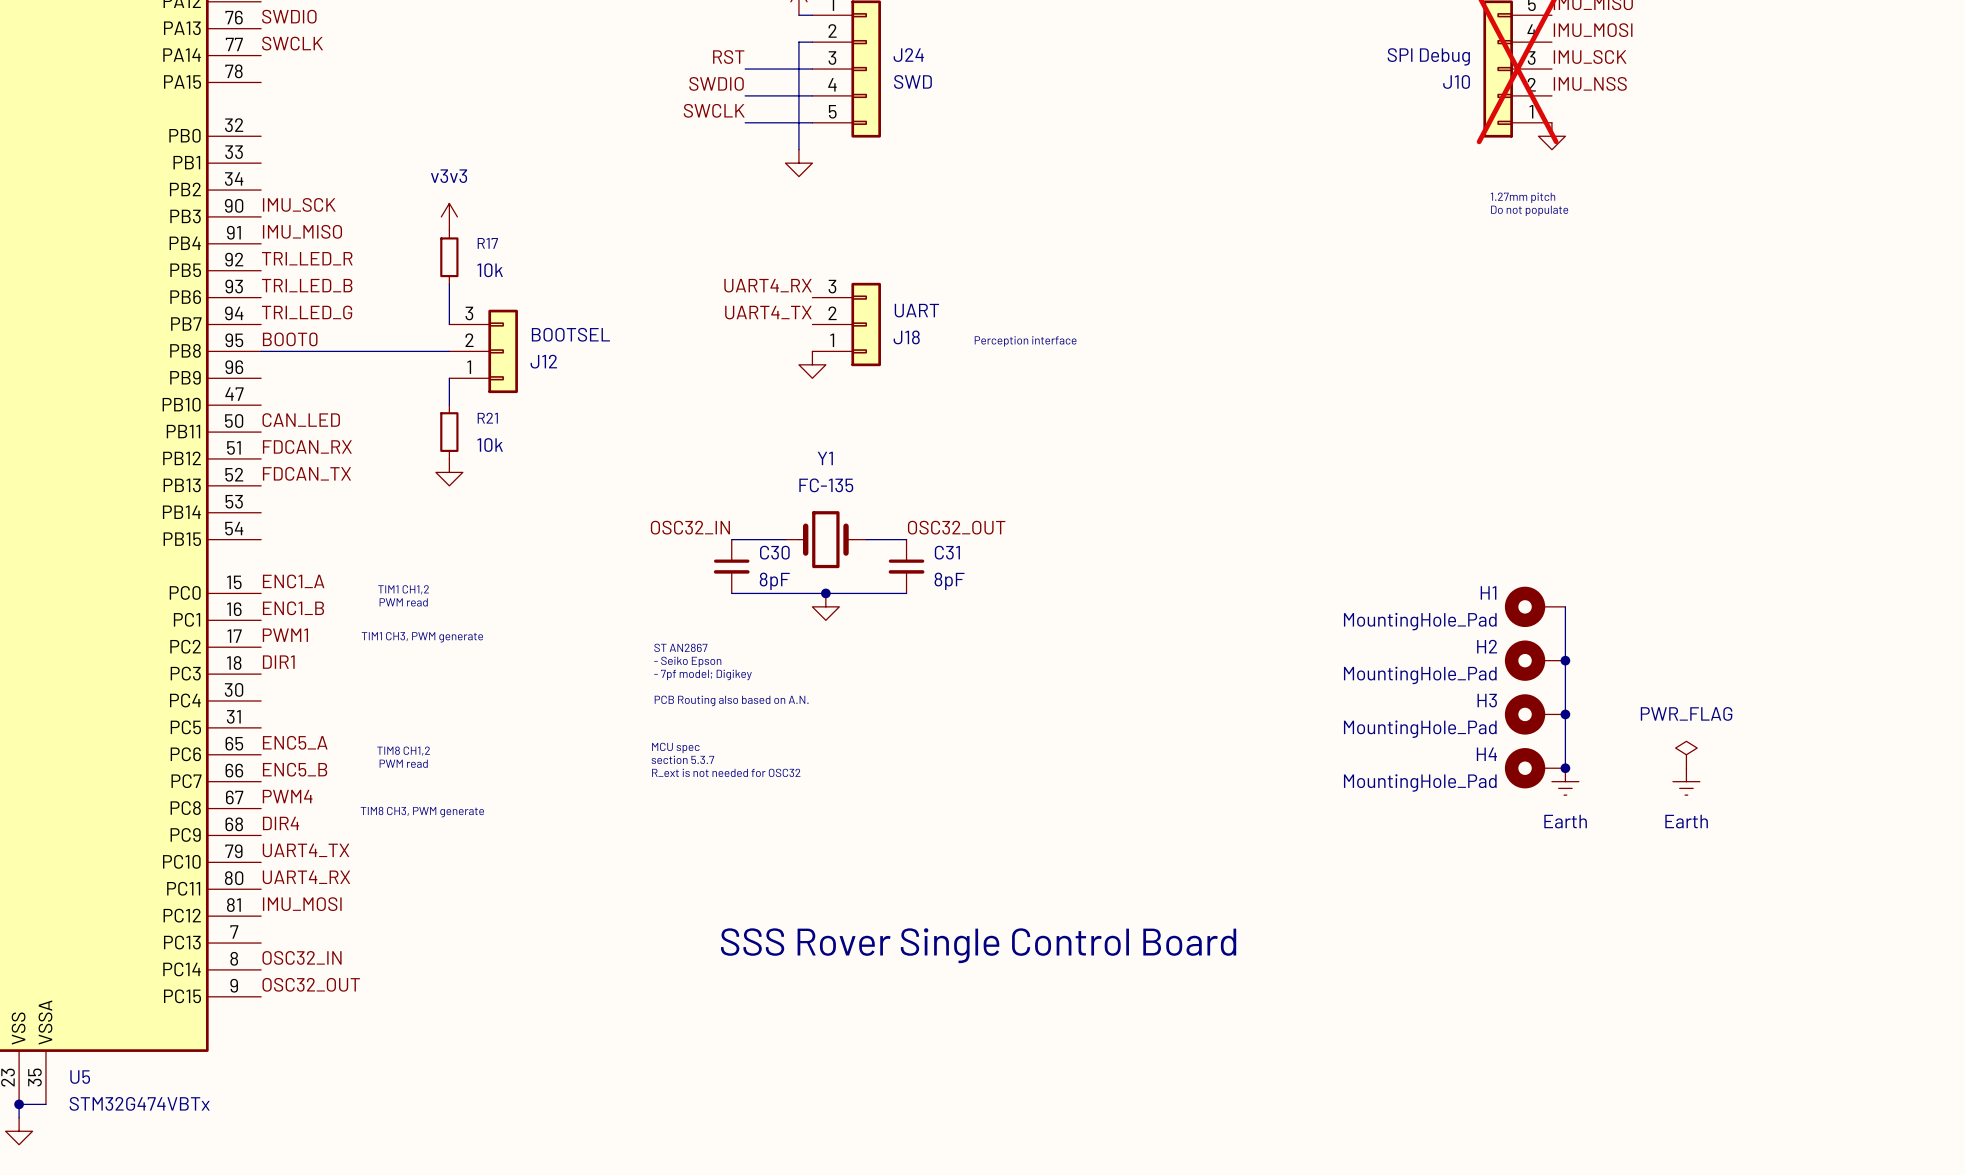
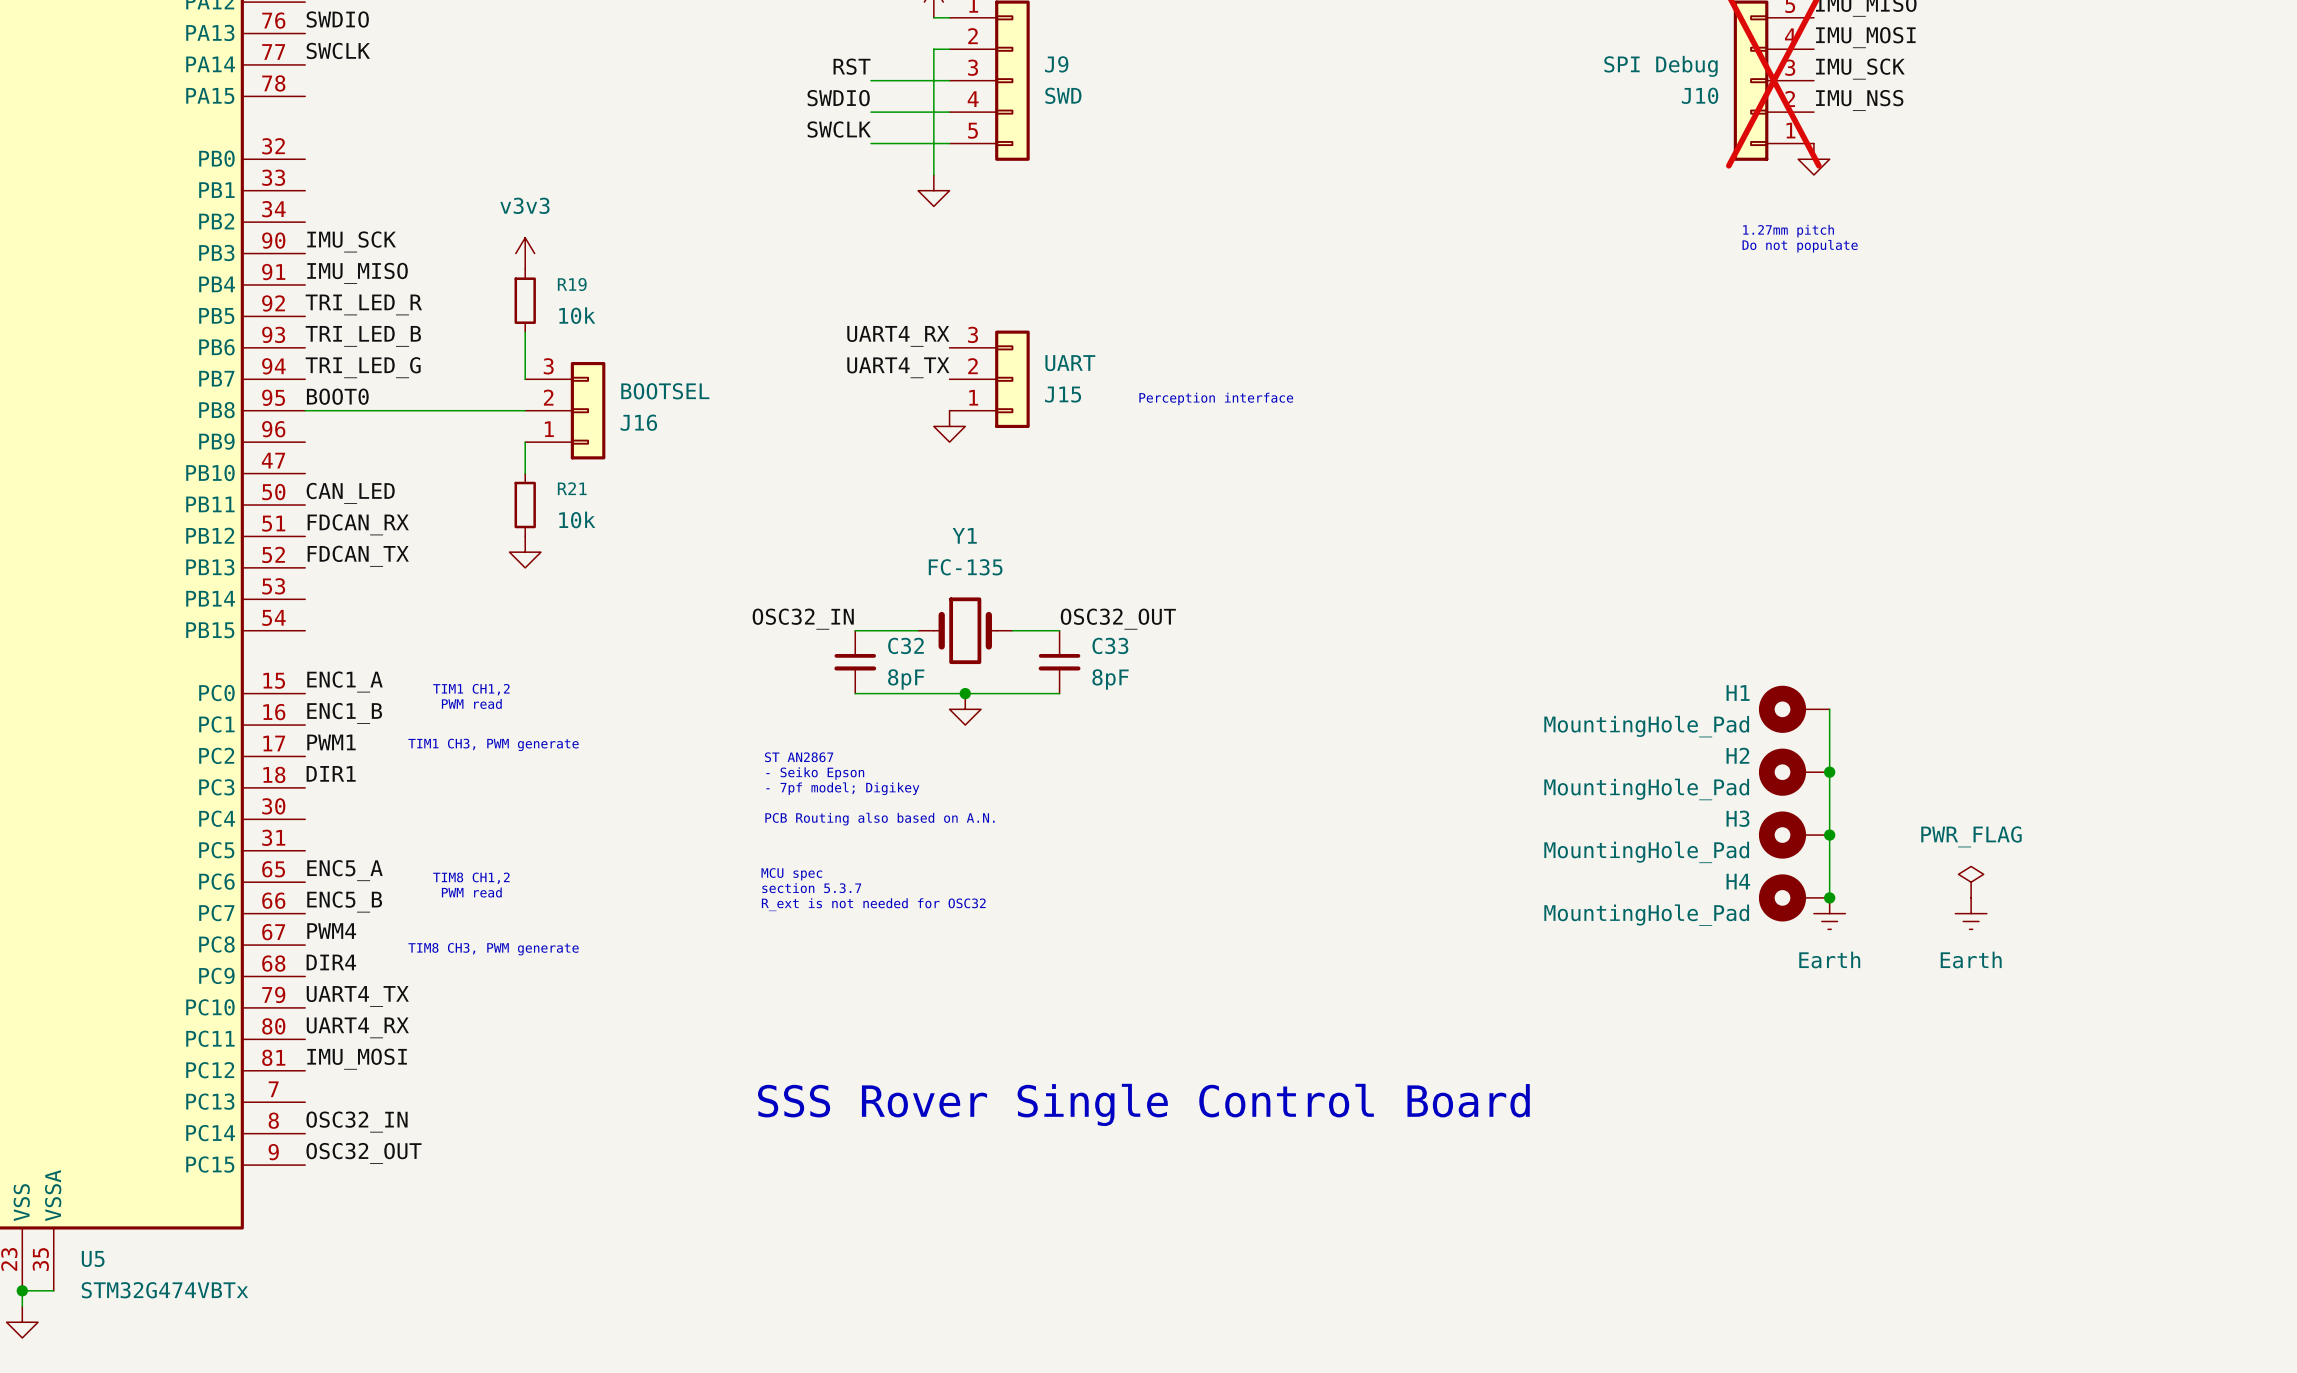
J24 name: J24 (908, 55) -> J9 (1056, 64)
R17 name: R17 (487, 243) -> R19 (572, 284)
J18 name: J18 (906, 337) -> J15 (1063, 394)
J12 name: J12 (543, 361) -> J16 (638, 422)
C30 name: C30 (774, 552) -> C32 (905, 645)
C31 name: C31 (947, 552) -> C33 (1110, 645)

